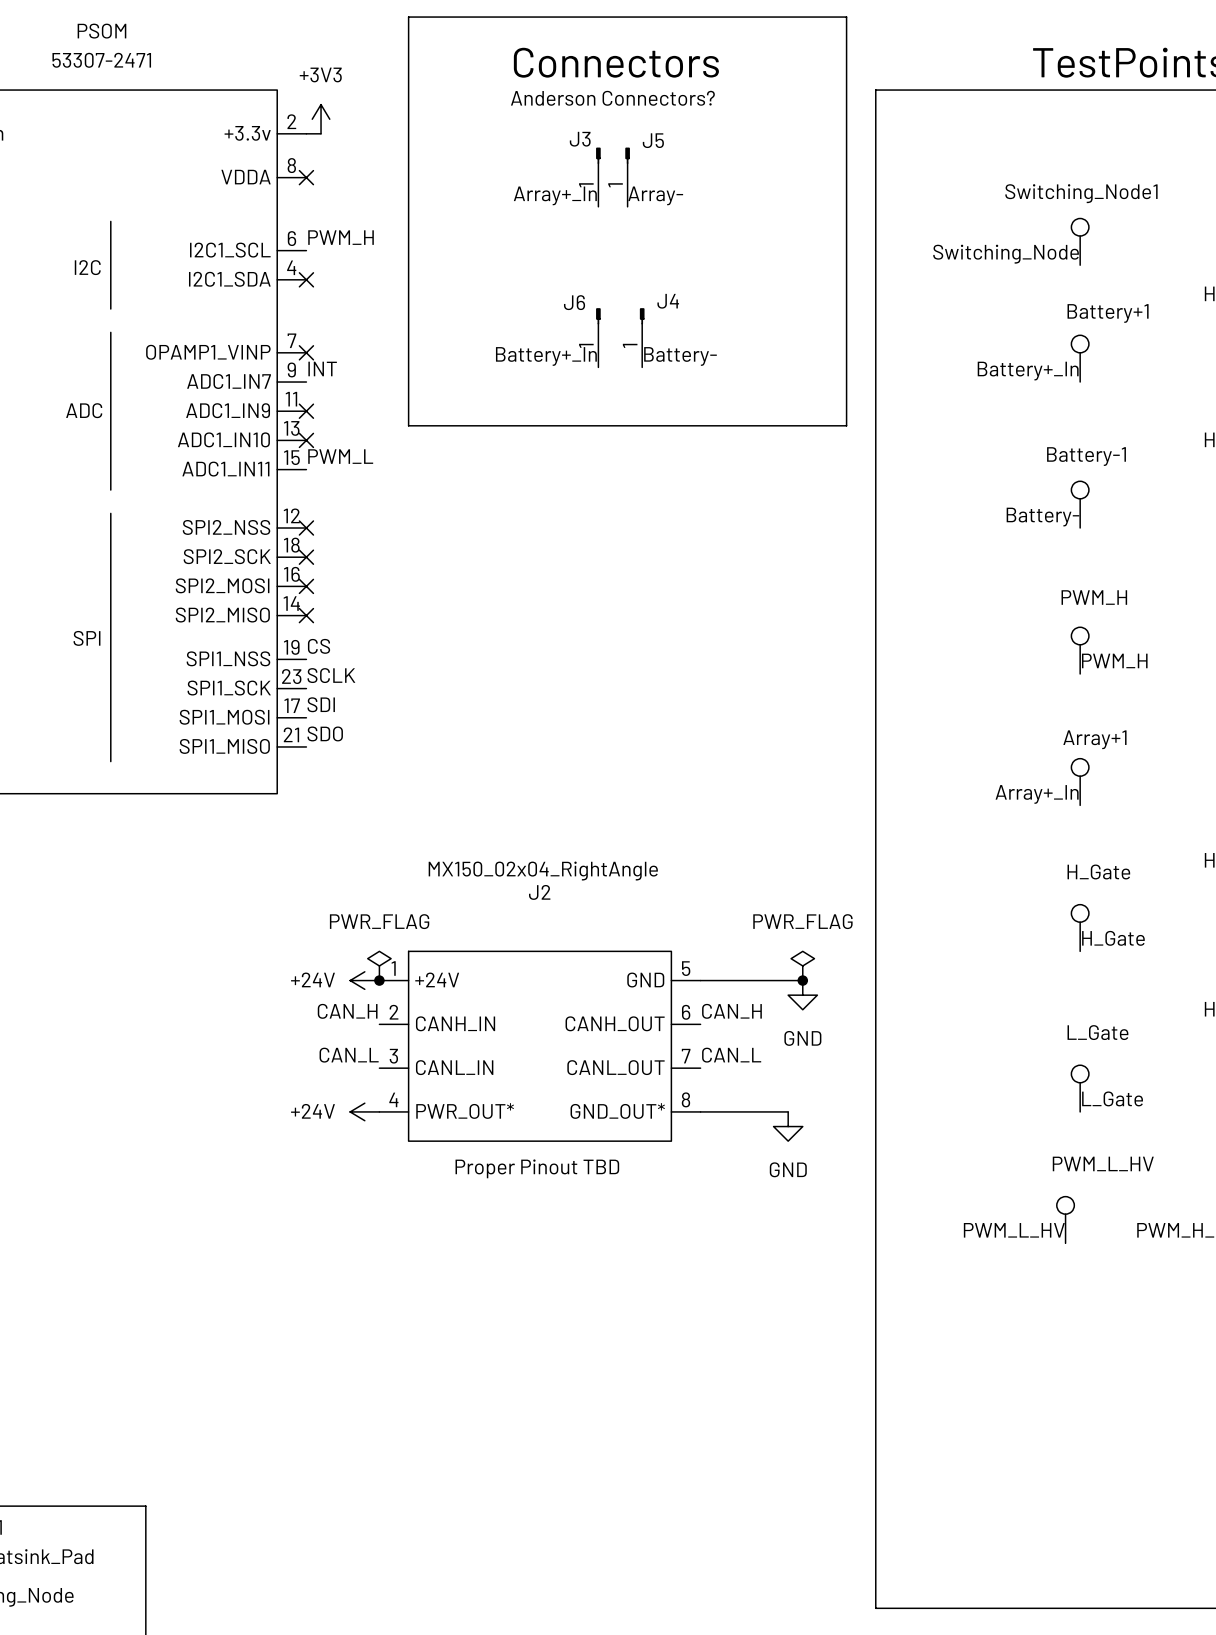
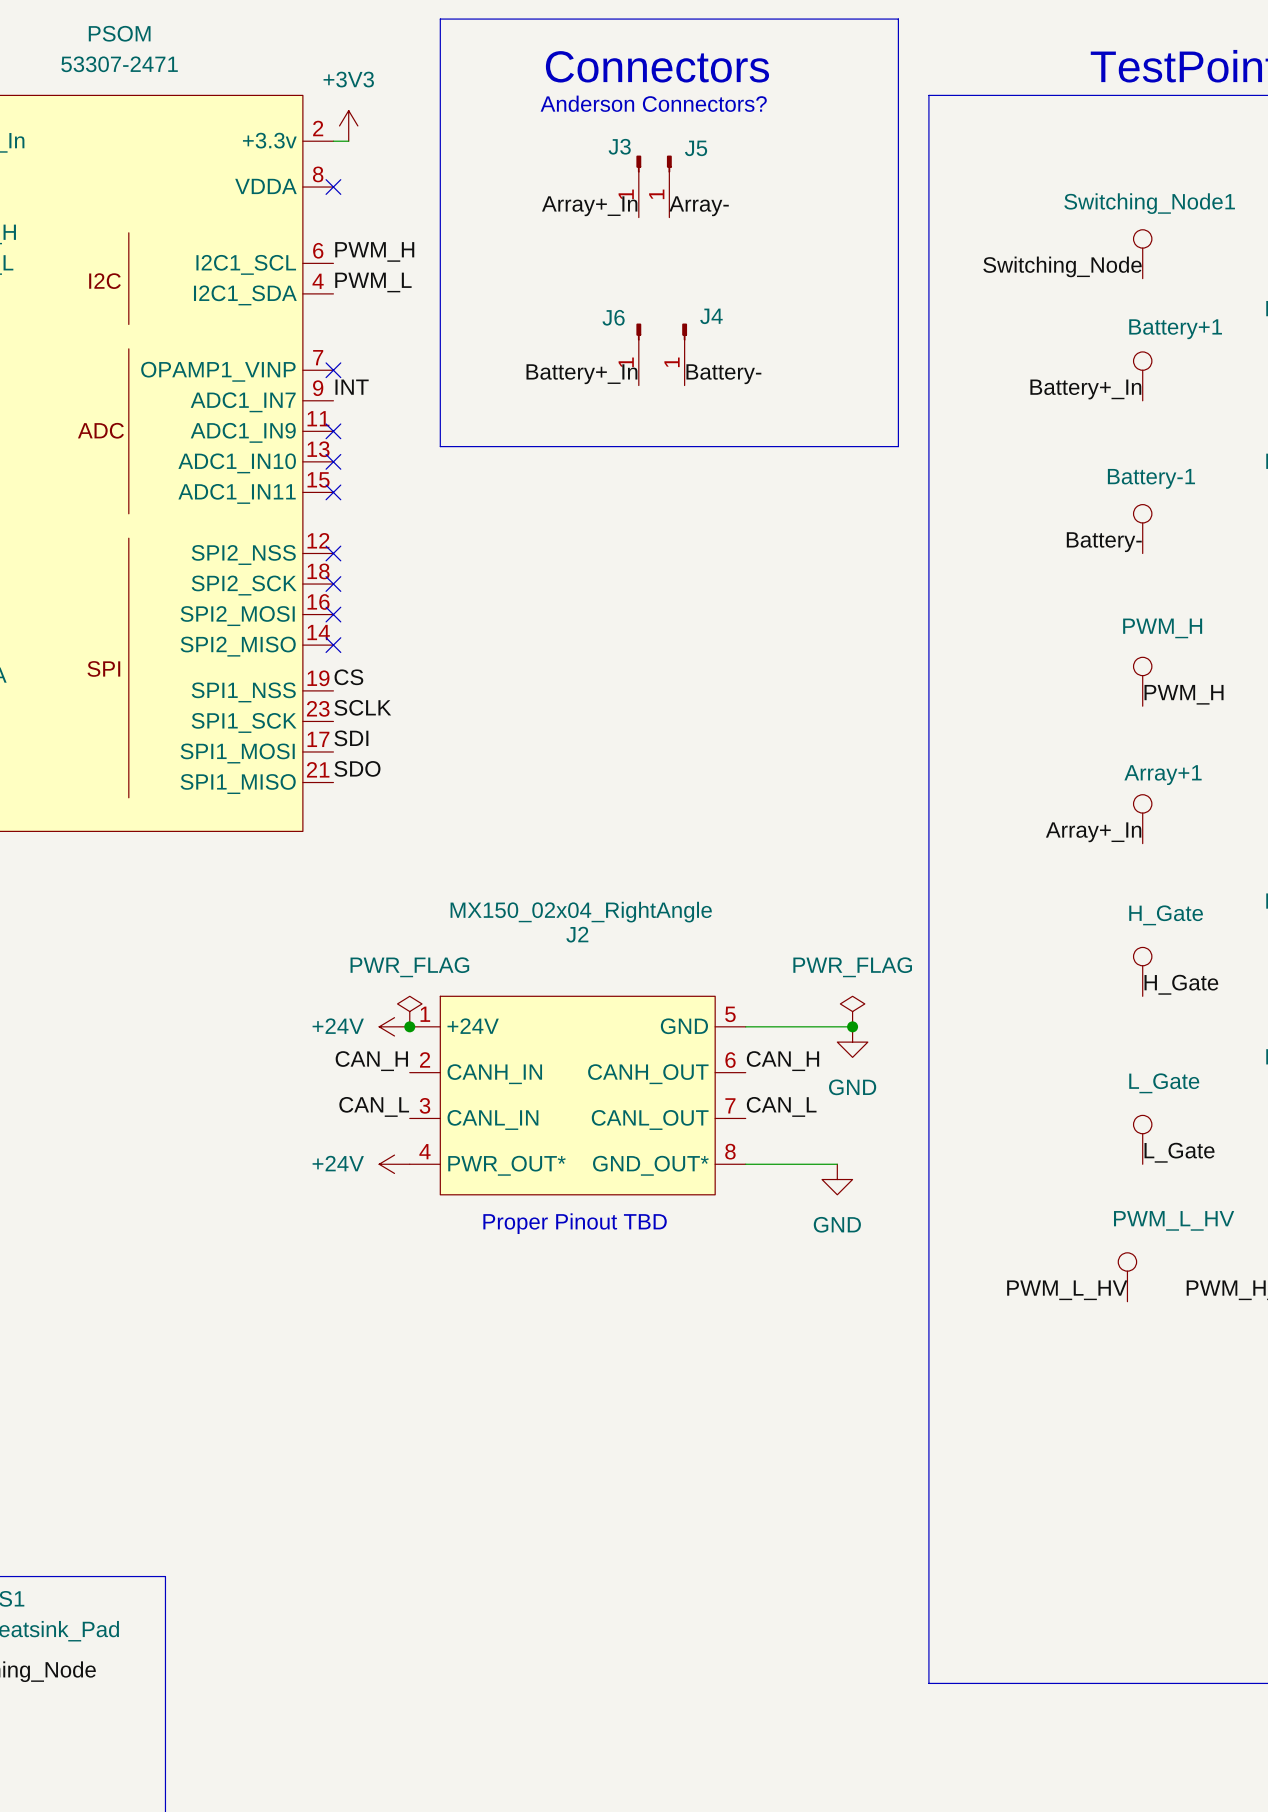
no-connect mark: (306, 279) -> none
label position: PWM_L (340, 456) -> PWM_L (373, 282)
no-connect mark: none -> (333, 492)

